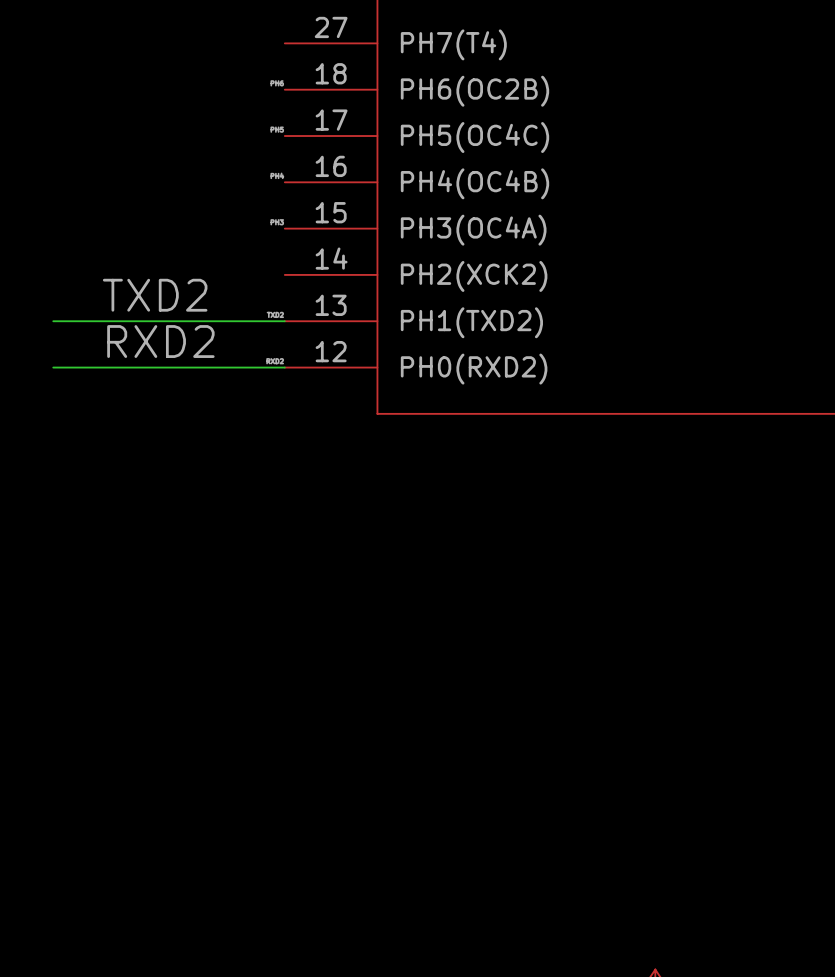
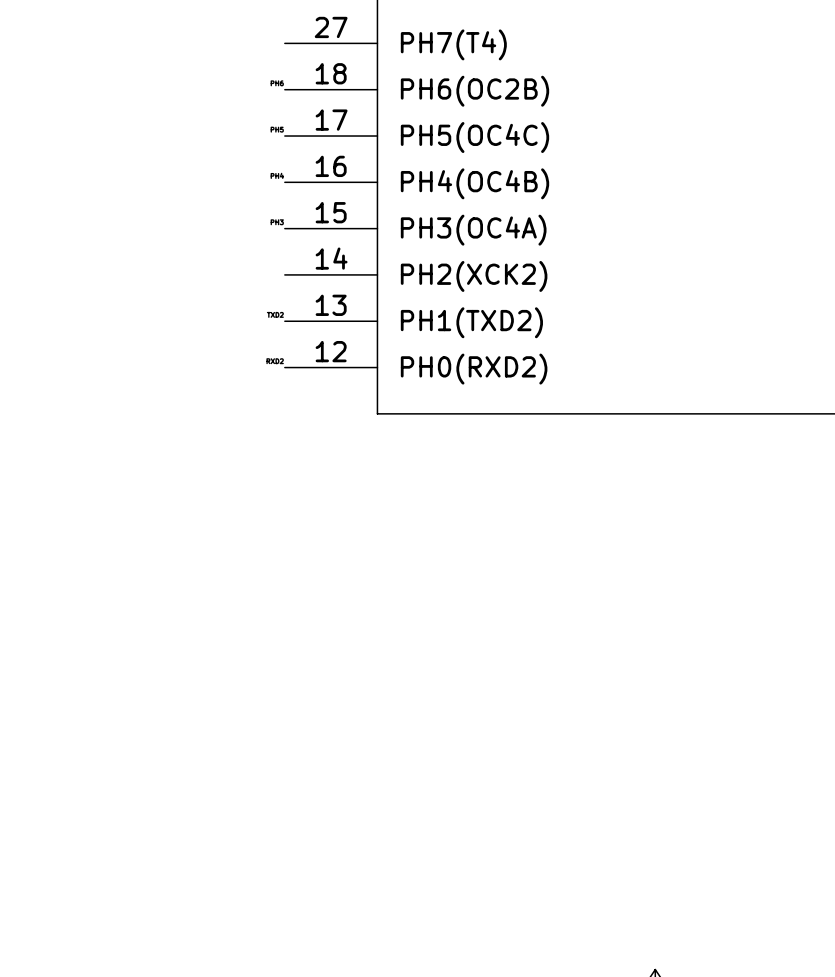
label: TXD2 (155, 295) -> none
wire: (53, 321) (284, 321) -> none
label: RXD2 (160, 341) -> none
wire: (53, 367) (284, 367) -> none

